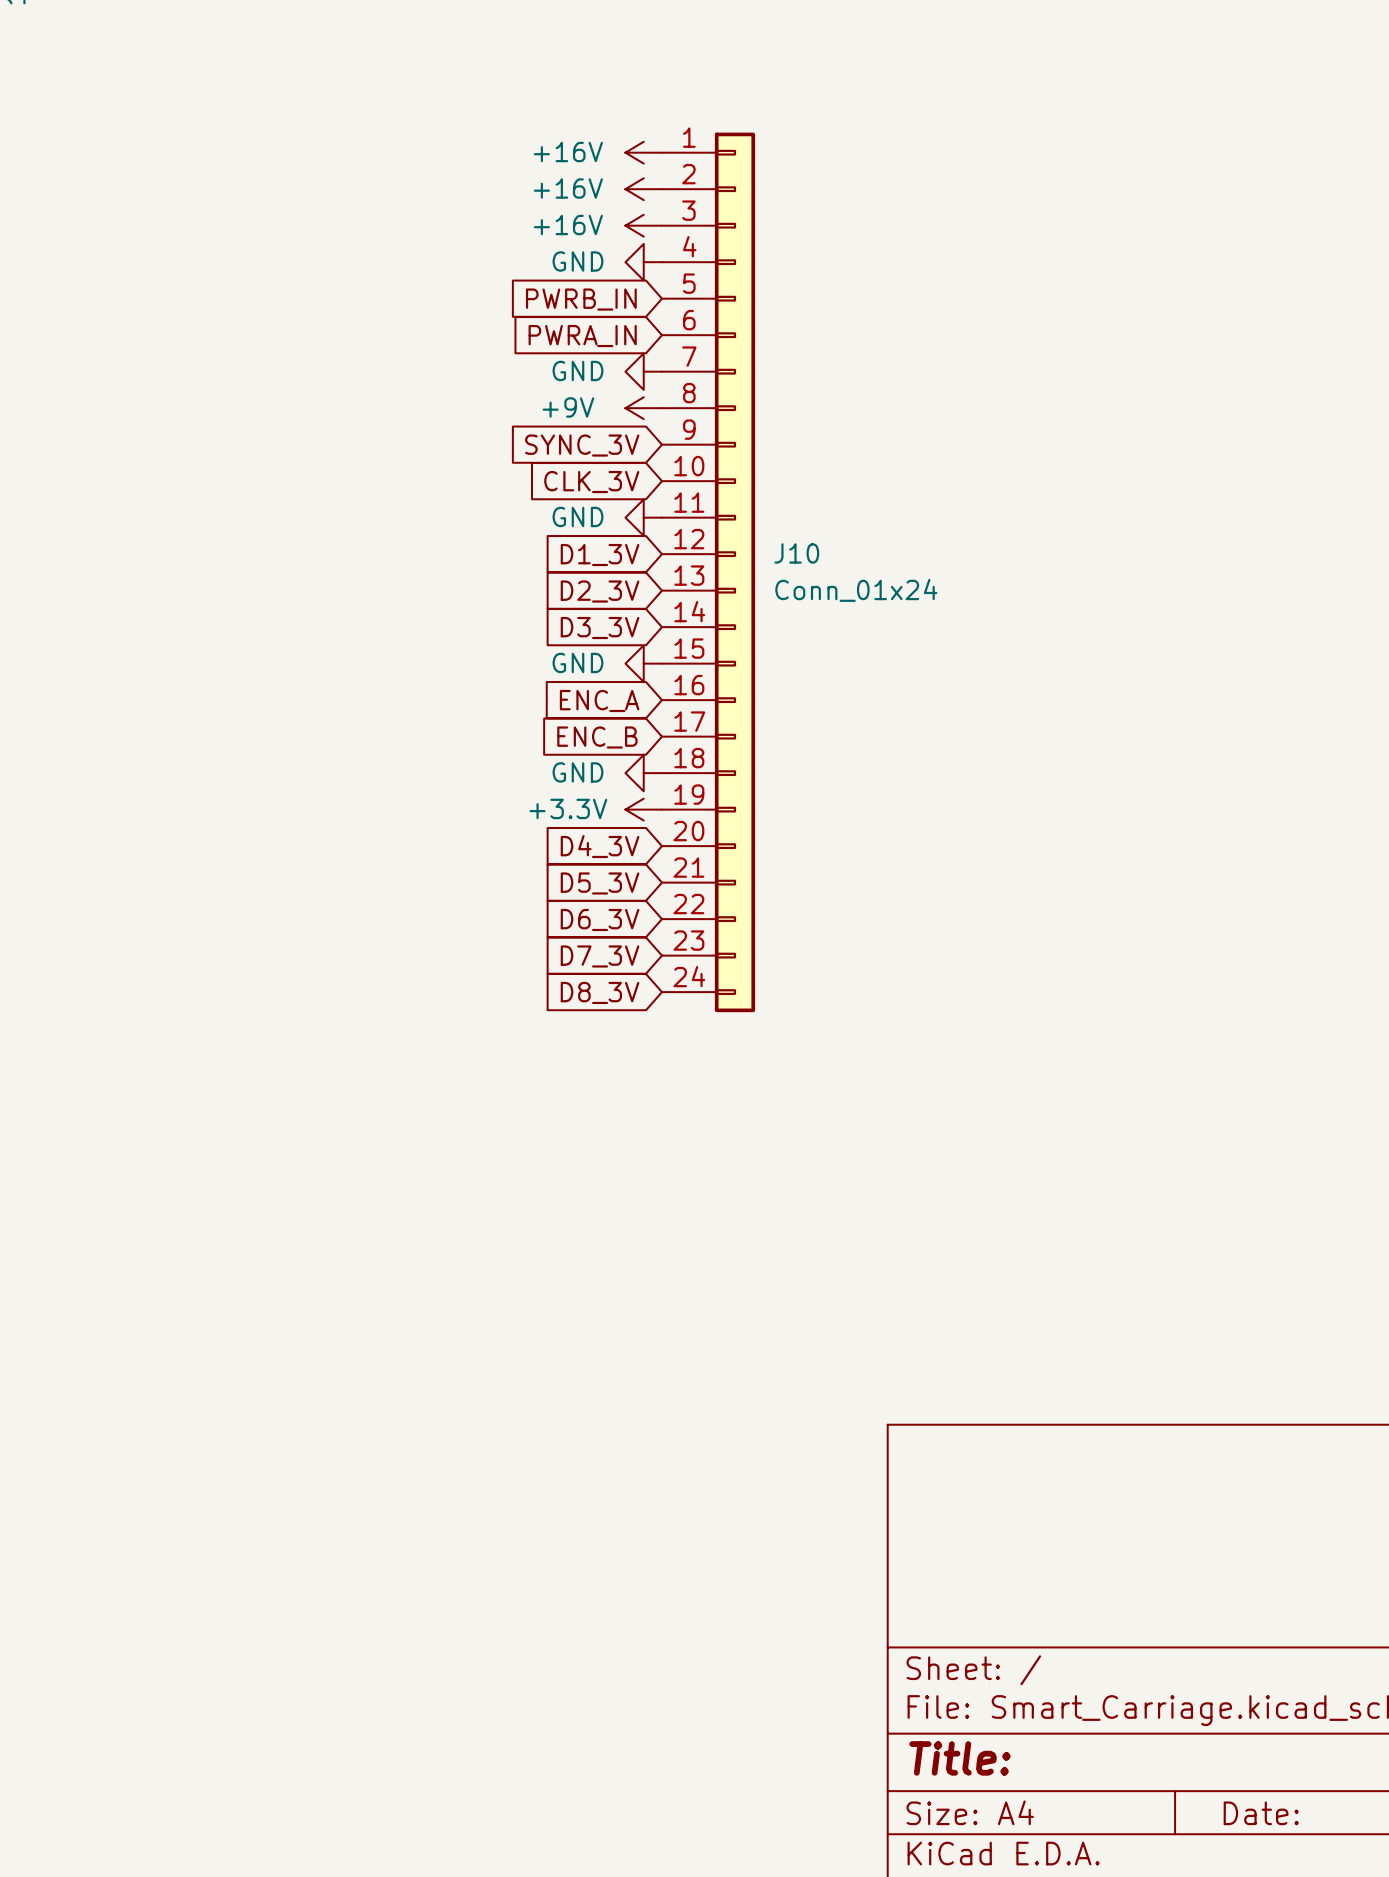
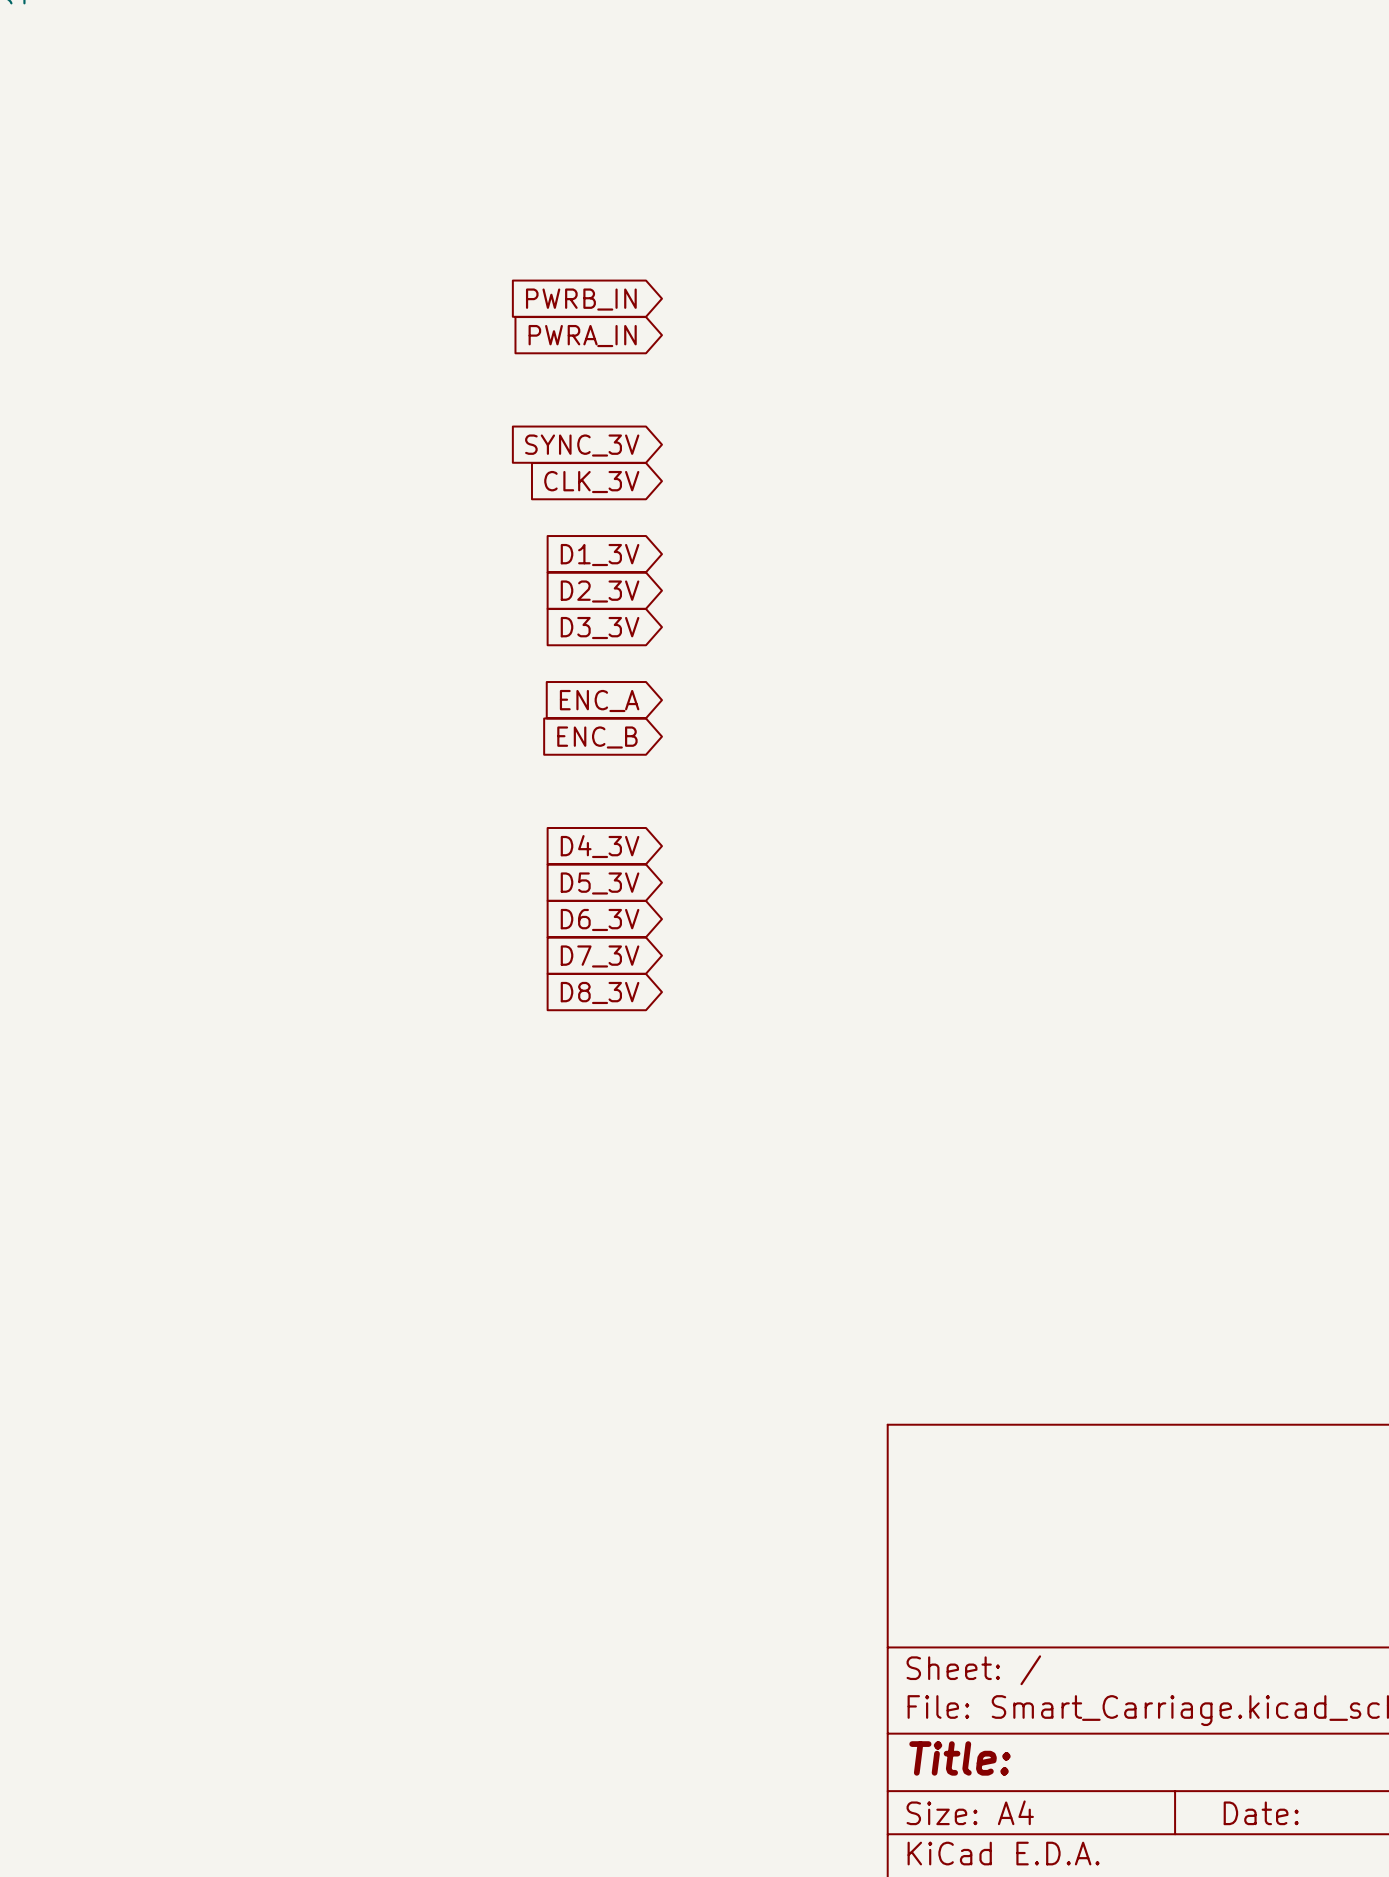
power symbol: +16V (643, 152) -> none
power symbol: +16V (643, 189) -> none
power symbol: +16V (643, 225) -> none
power symbol: GND (643, 262) -> none
power symbol: GND (643, 371) -> none
power symbol: +9V (643, 408) -> none
power symbol: GND (643, 517) -> none
J10: Conn_01x24 (708, 572) -> none
power symbol: GND (643, 663) -> none
power symbol: GND (643, 773) -> none
power symbol: +3.3V (643, 809) -> none

